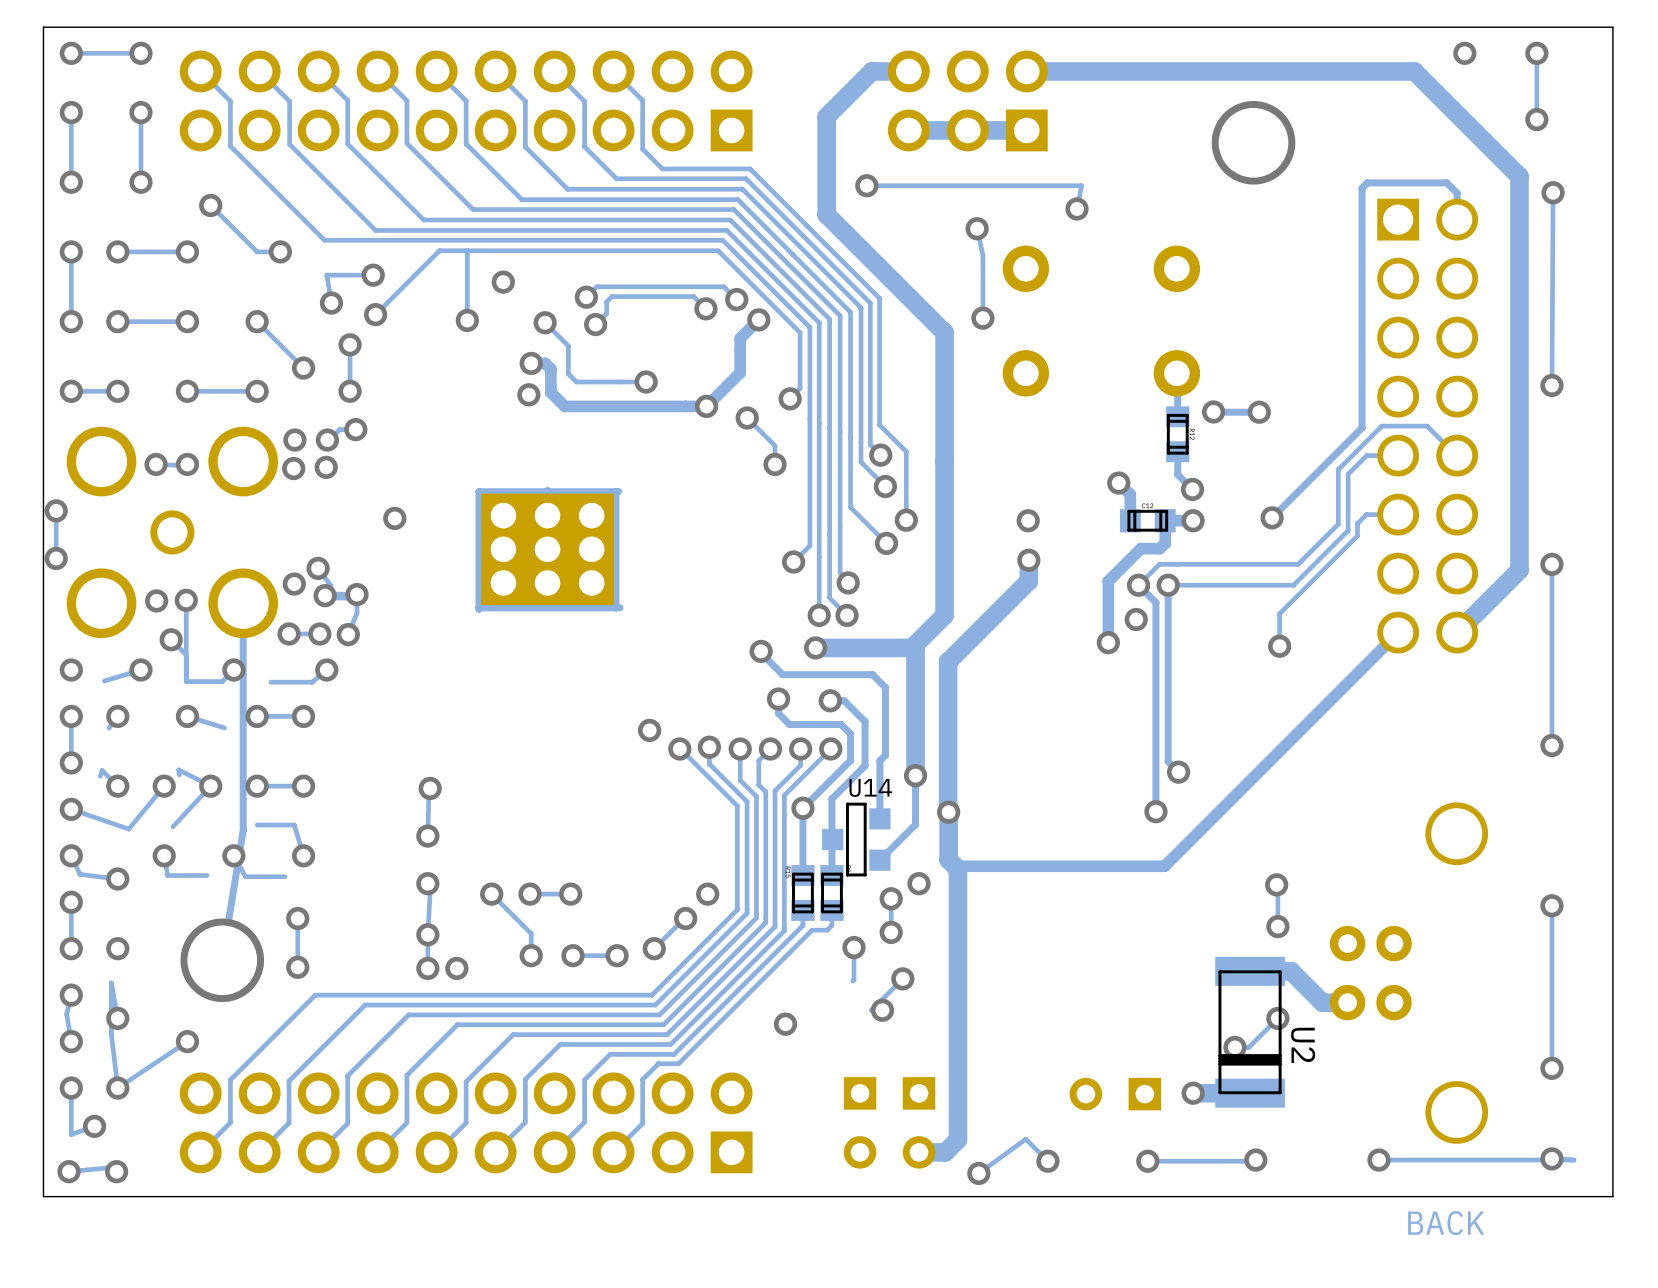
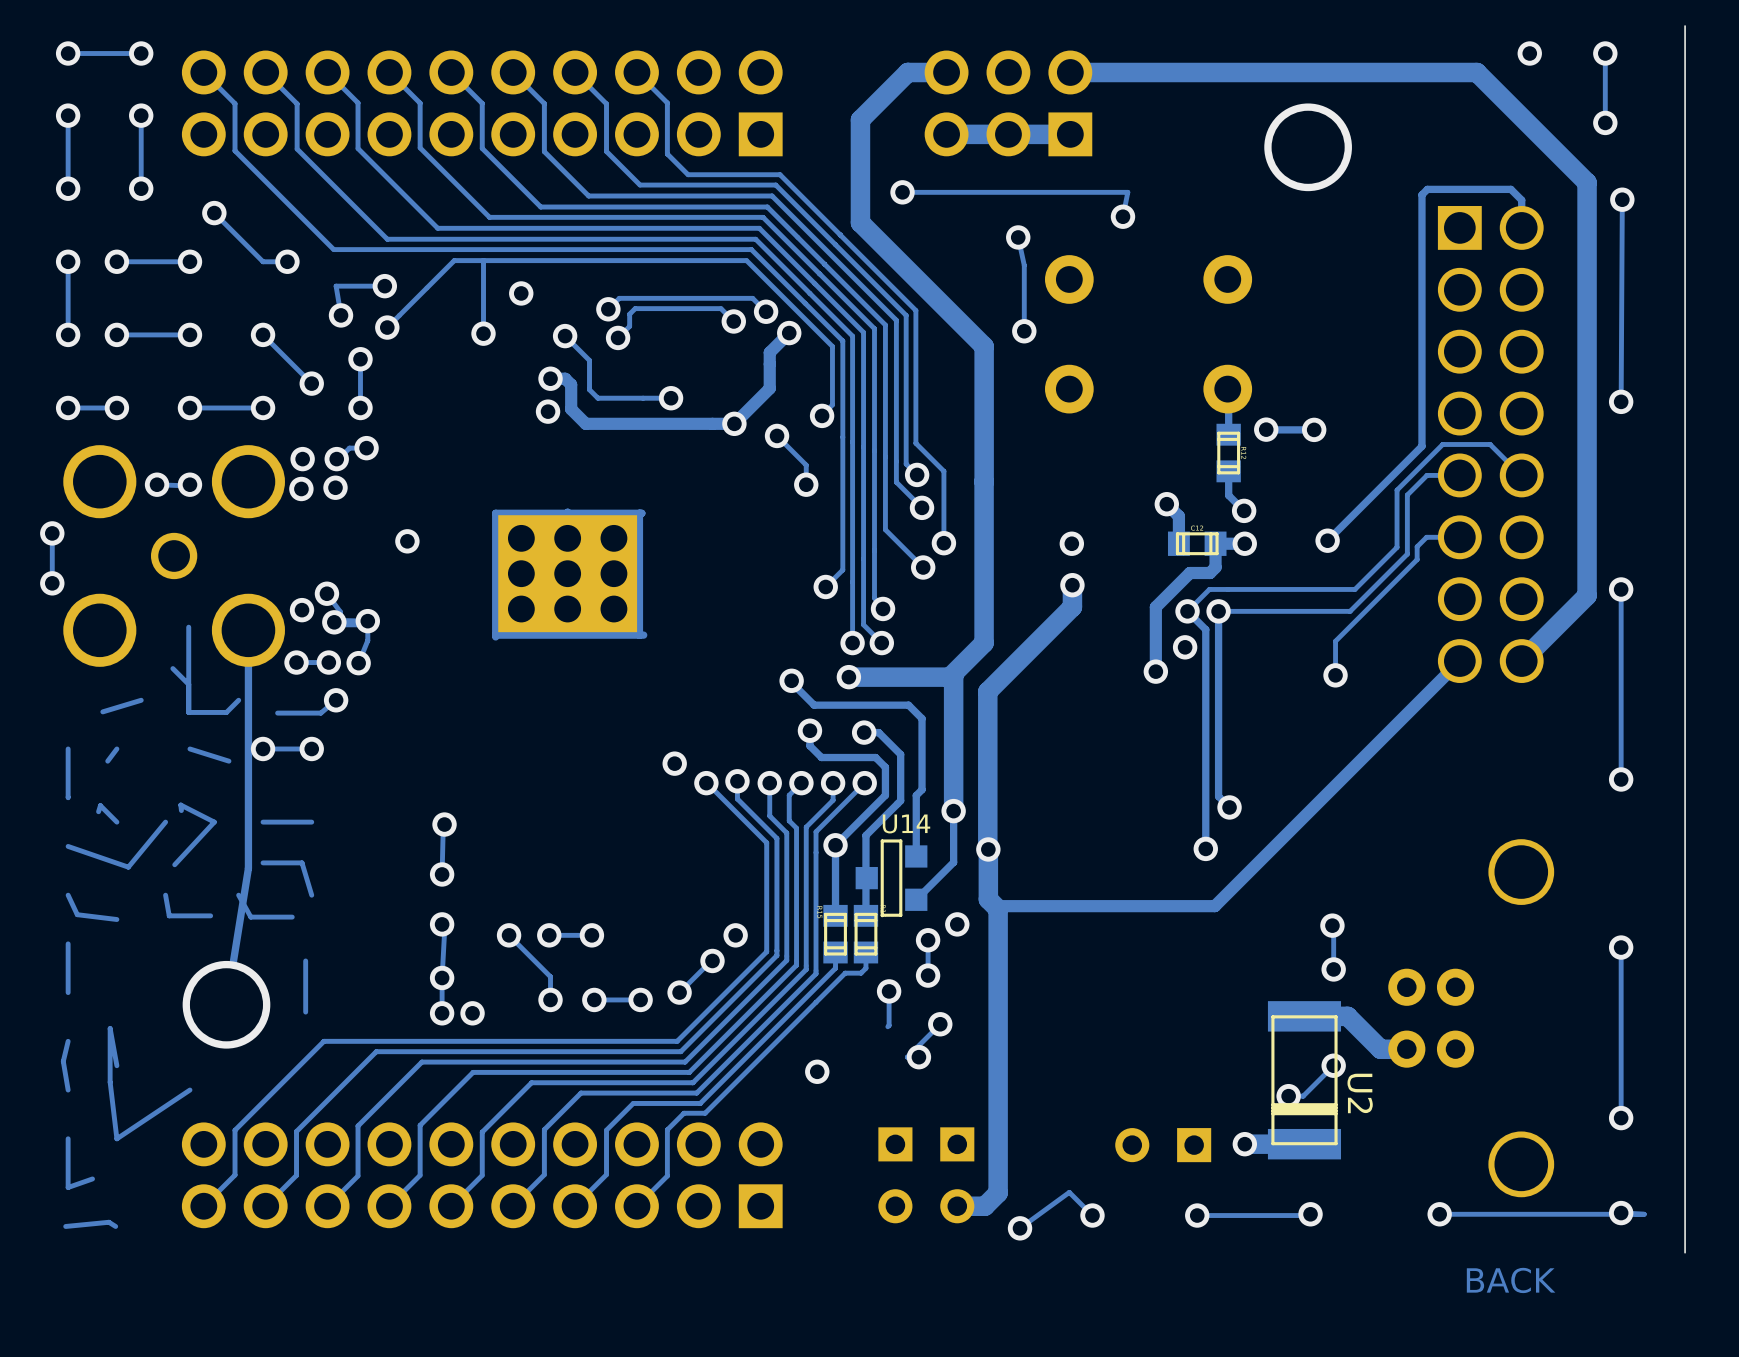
board edge: (1612, 27) (43, 27) (43, 1196) (1612, 1196) -> none
via: (156, 600) -> none
via: (186, 600) -> none
via: (171, 639) -> none
via: (71, 670) -> none
via: (140, 670) -> none
via: (233, 670) -> none
via: (71, 716) -> none
via: (117, 716) -> none
via: (187, 716) -> none
via: (71, 762) -> none
via: (117, 786) -> none
via: (164, 786) -> none
via: (210, 786) -> none
via: (257, 786) -> none
via: (303, 786) -> none
via: (71, 809) -> none
via: (71, 855) -> none
via: (164, 855) -> none
via: (233, 855) -> none
via: (303, 855) -> none
via: (117, 879) -> none
via: (71, 902) -> none
via: (297, 918) -> none
via: (71, 948) -> none
via: (117, 948) -> none
via: (297, 967) -> none
via: (71, 995) -> none
via: (117, 1018) -> none
via: (71, 1041) -> none
via: (187, 1041) -> none
via: (71, 1088) -> none
via: (117, 1088) -> none
via: (94, 1126) -> none
via: (69, 1171) -> none
via: (116, 1171) -> none

